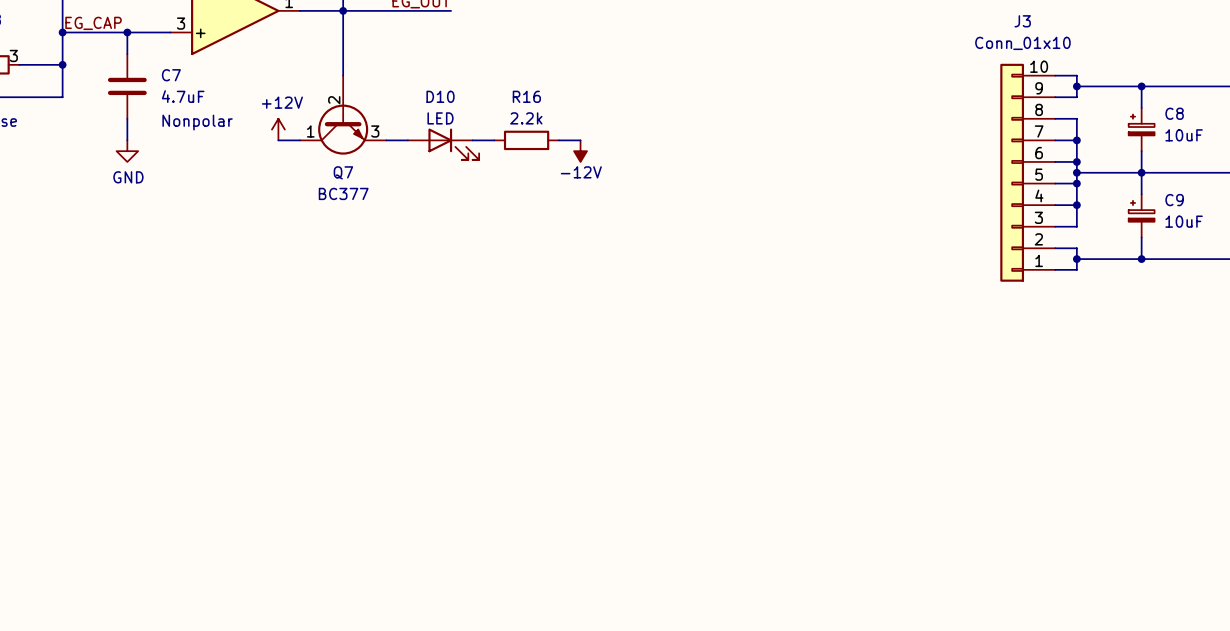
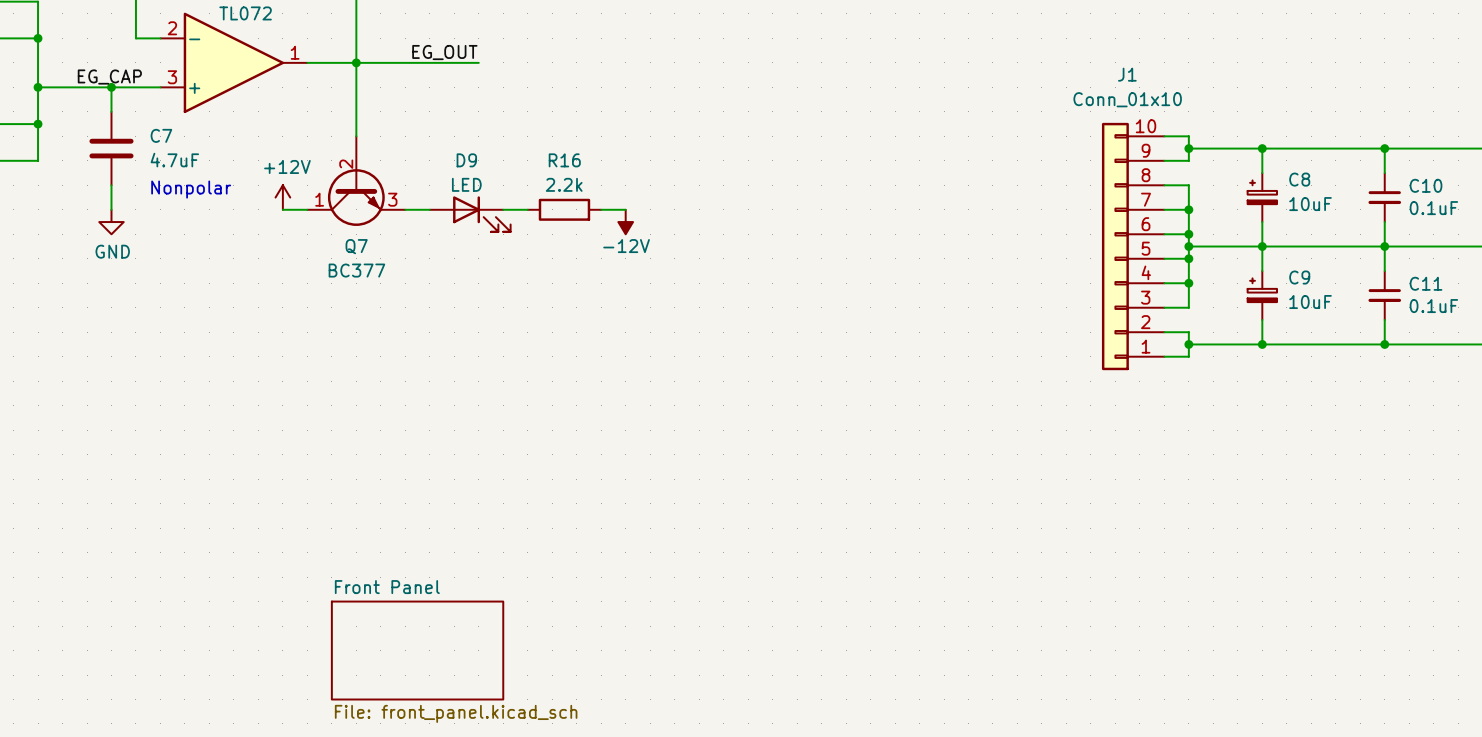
J3 name: J3 (1022, 21) -> J1 (1127, 74)
label position: EG_CAP (93, 23) -> EG_CAP (109, 77)
D10 name: D10 (440, 96) -> D9 (466, 160)
sheet Front Panel: none -> File: front_panel.kicad_sch (417, 650)

